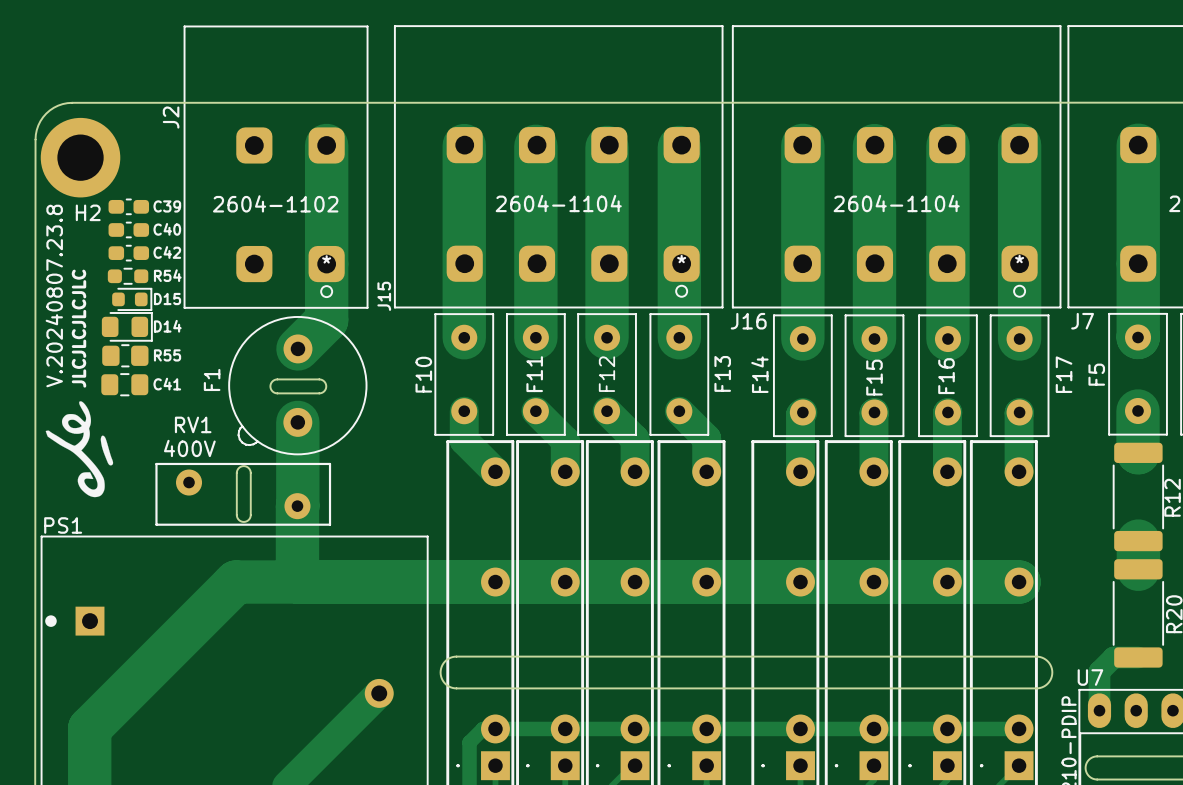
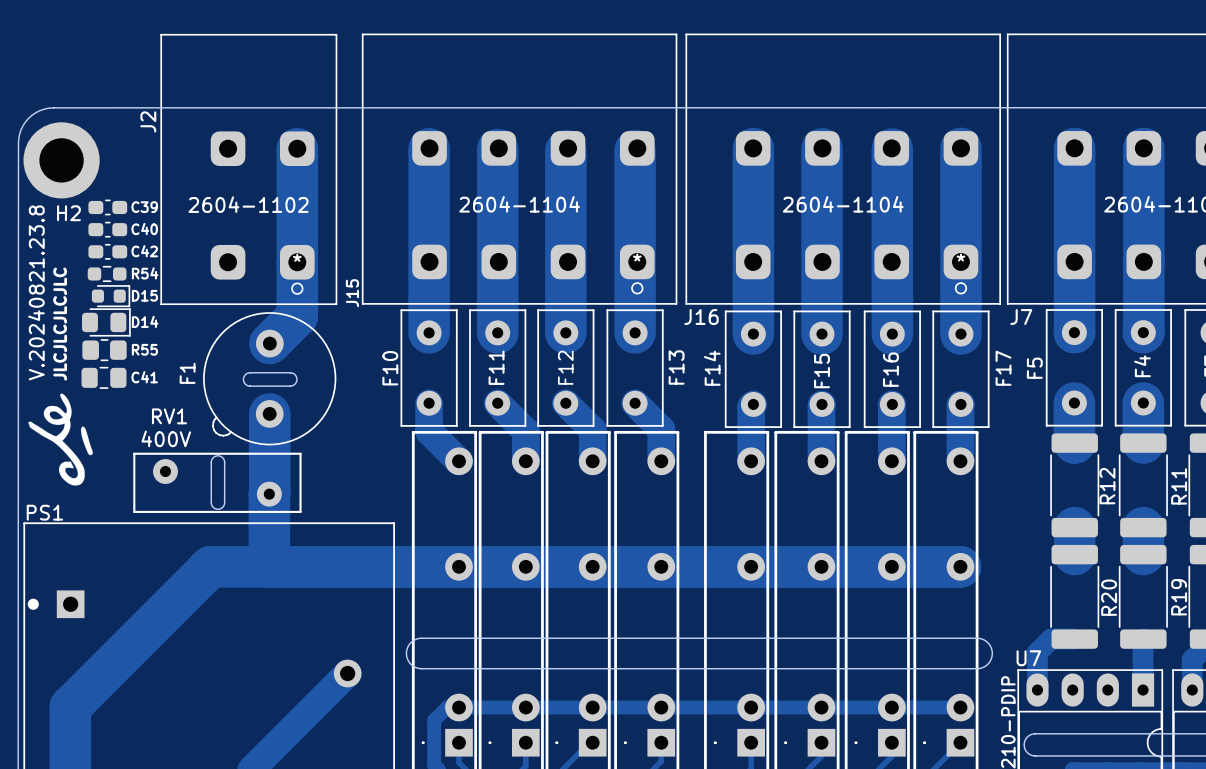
text: V.20240807.23.8 (54, 295) -> V.20240821.23.8 (36, 292)

